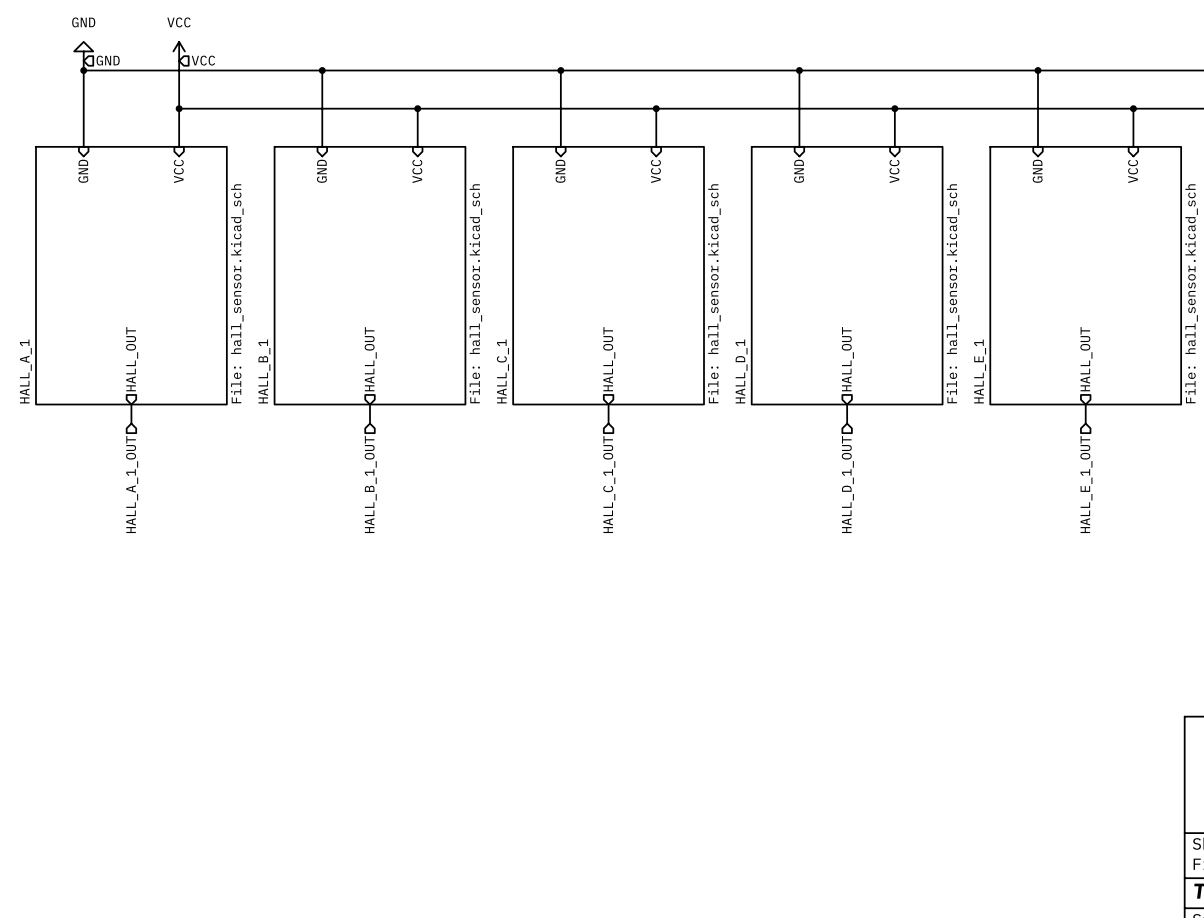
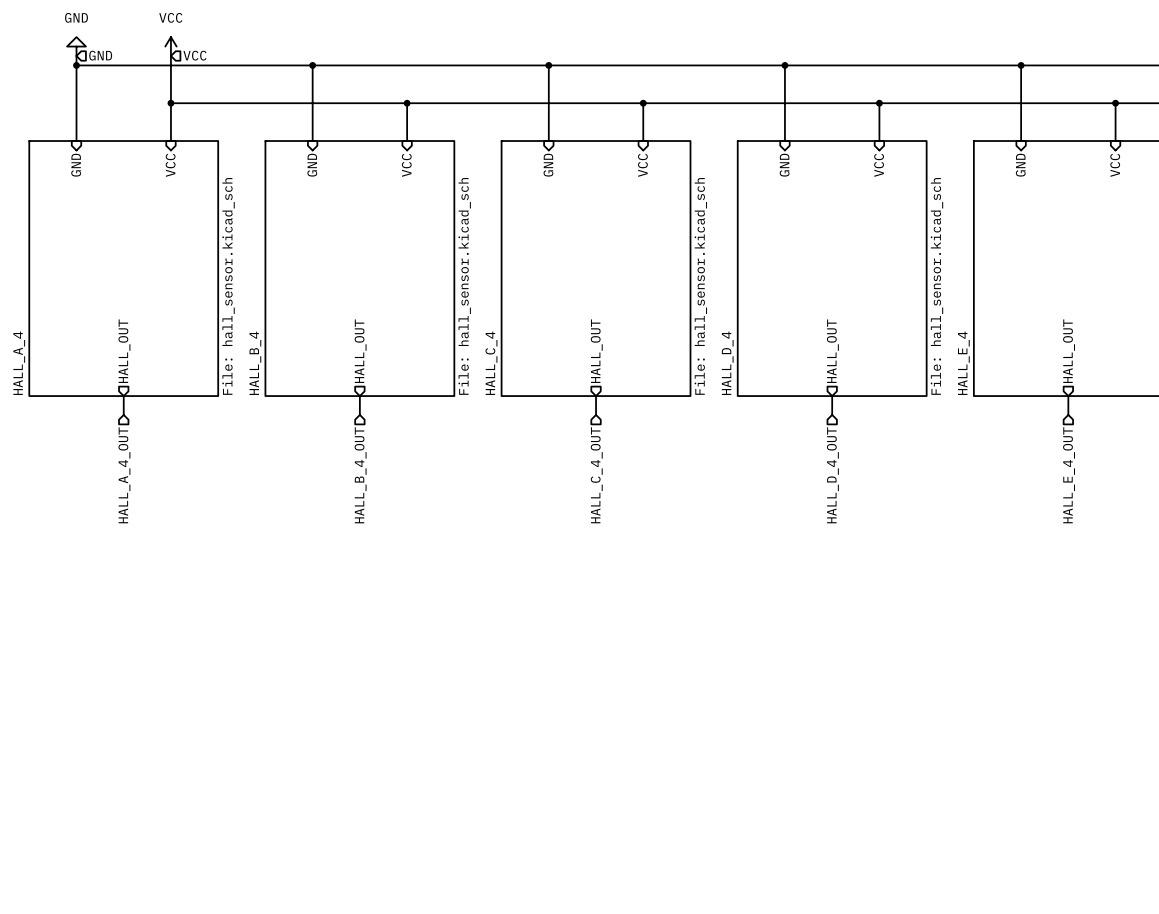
sheet HALL_A_1 name: HALL_A_1 (25, 371) -> HALL_A_4 (19, 363)
sheet HALL_B_1 name: HALL_B_1 (264, 371) -> HALL_B_4 (255, 363)
sheet HALL_C_1 name: HALL_C_1 (502, 371) -> HALL_C_4 (491, 363)
sheet HALL_D_1 name: HALL_D_1 (741, 371) -> HALL_D_4 (727, 363)
sheet HALL_E_1 name: HALL_E_1 (980, 371) -> HALL_E_4 (963, 363)
hierarchical label: HALL_A_1_OUT (132, 484) -> HALL_A_4_OUT (124, 475)
hierarchical label: HALL_B_1_OUT (370, 484) -> HALL_B_4_OUT (360, 475)
hierarchical label: HALL_C_1_OUT (609, 484) -> HALL_C_4_OUT (596, 475)
hierarchical label: HALL_D_1_OUT (847, 484) -> HALL_D_4_OUT (832, 475)
hierarchical label: HALL_E_1_OUT (1086, 484) -> HALL_E_4_OUT (1069, 475)

